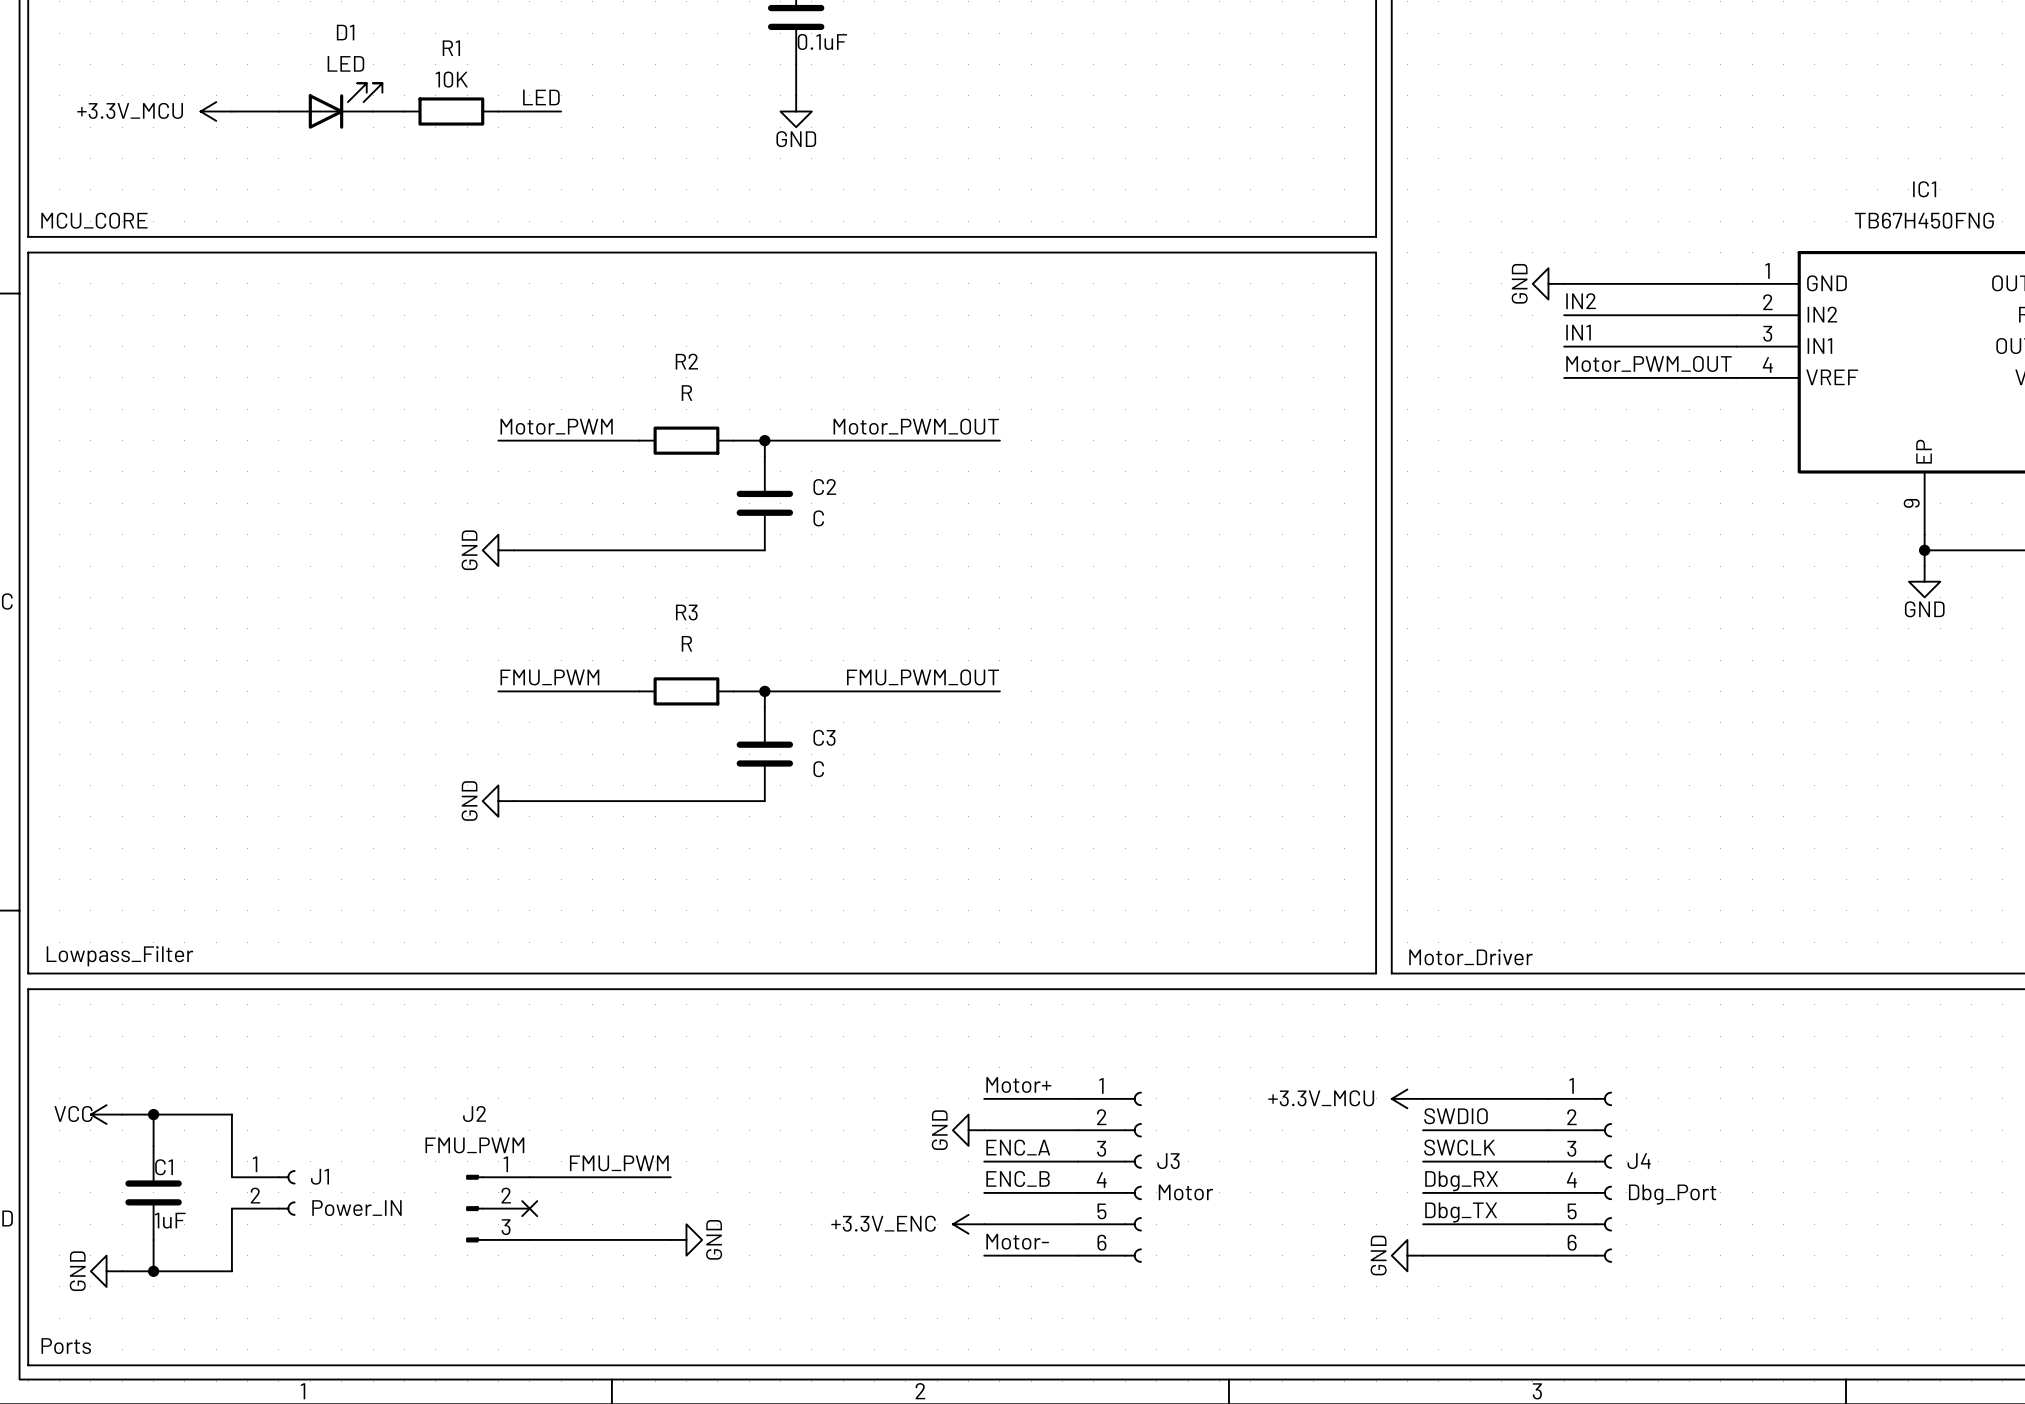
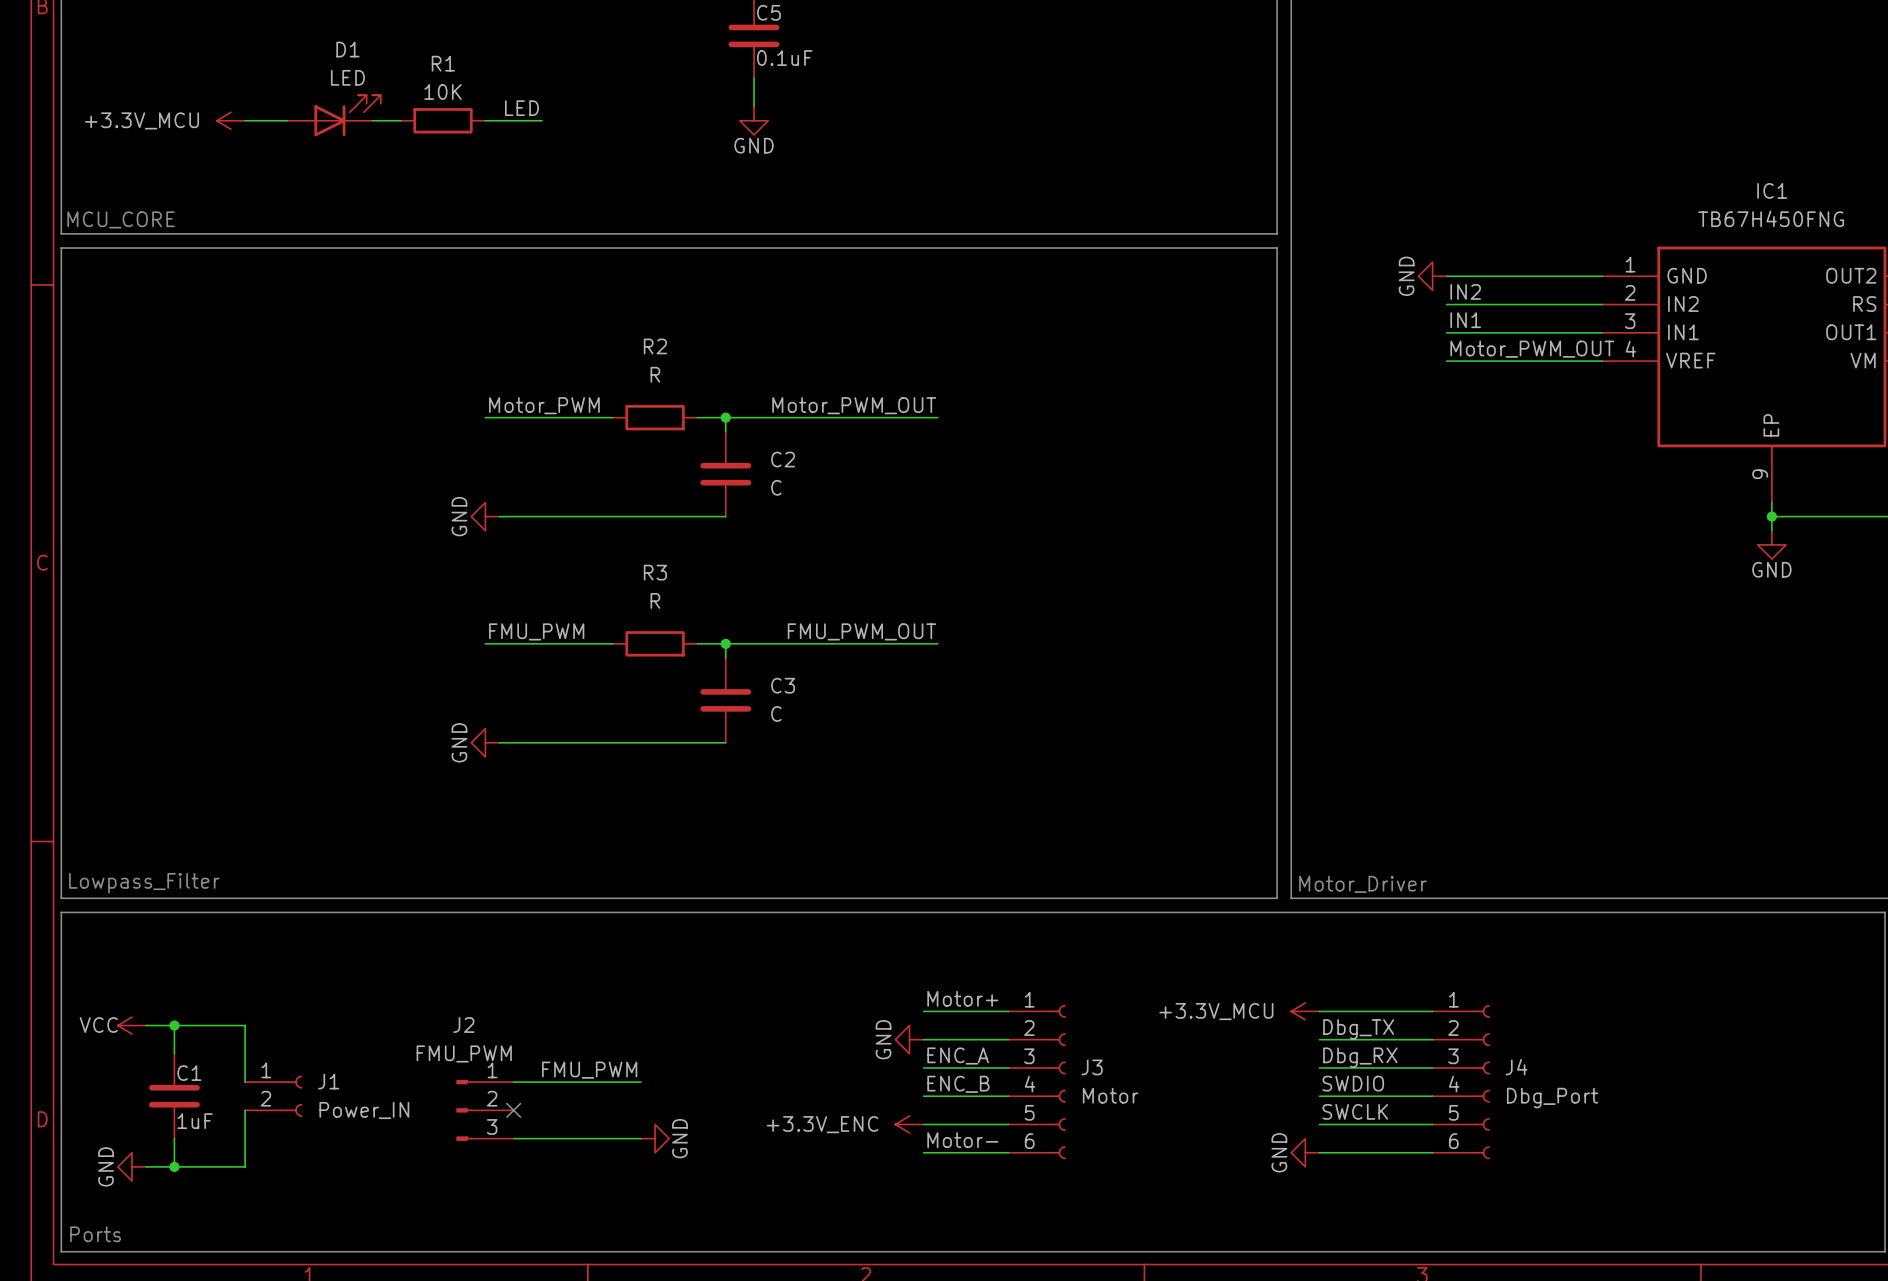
label: SWDIO (1456, 1116) -> Dbg_TX (1358, 1029)
label: SWCLK (1459, 1147) -> Dbg_RX (1360, 1057)
label: Dbg_RX (1461, 1181) -> SWDIO (1353, 1083)
label: Dbg_TX (1461, 1212) -> SWCLK (1355, 1111)

